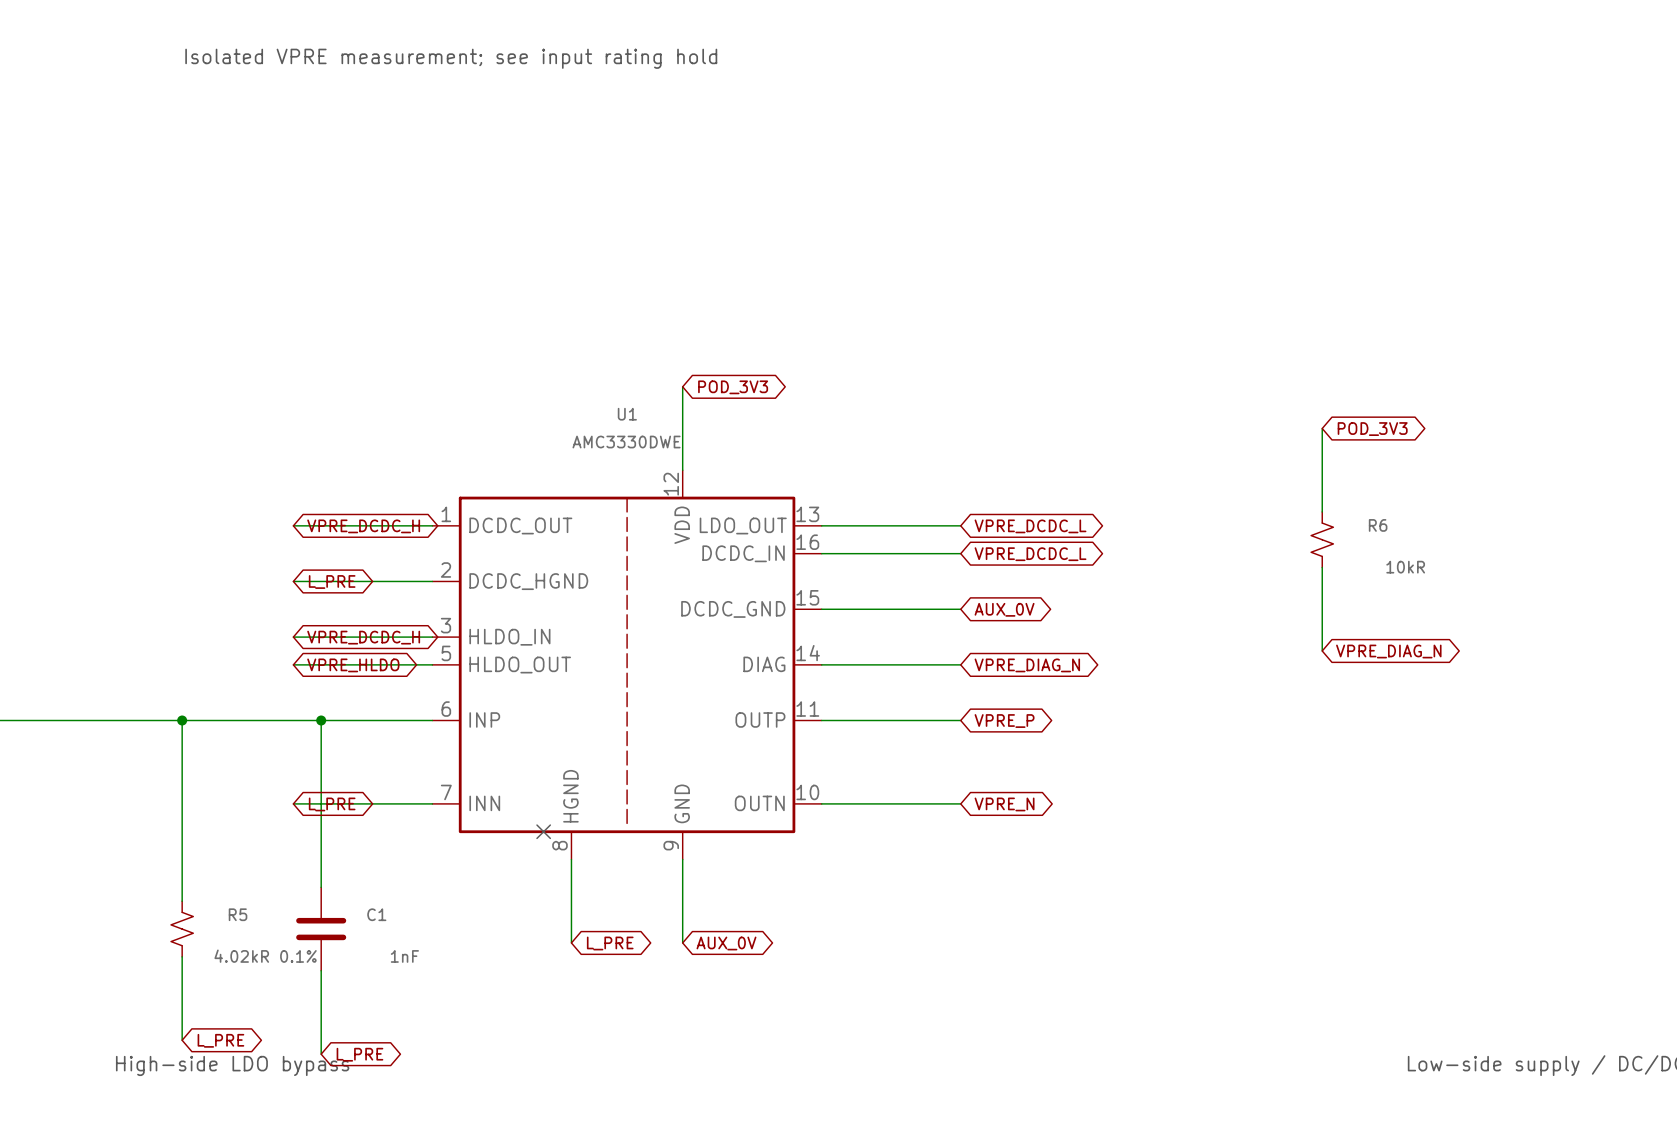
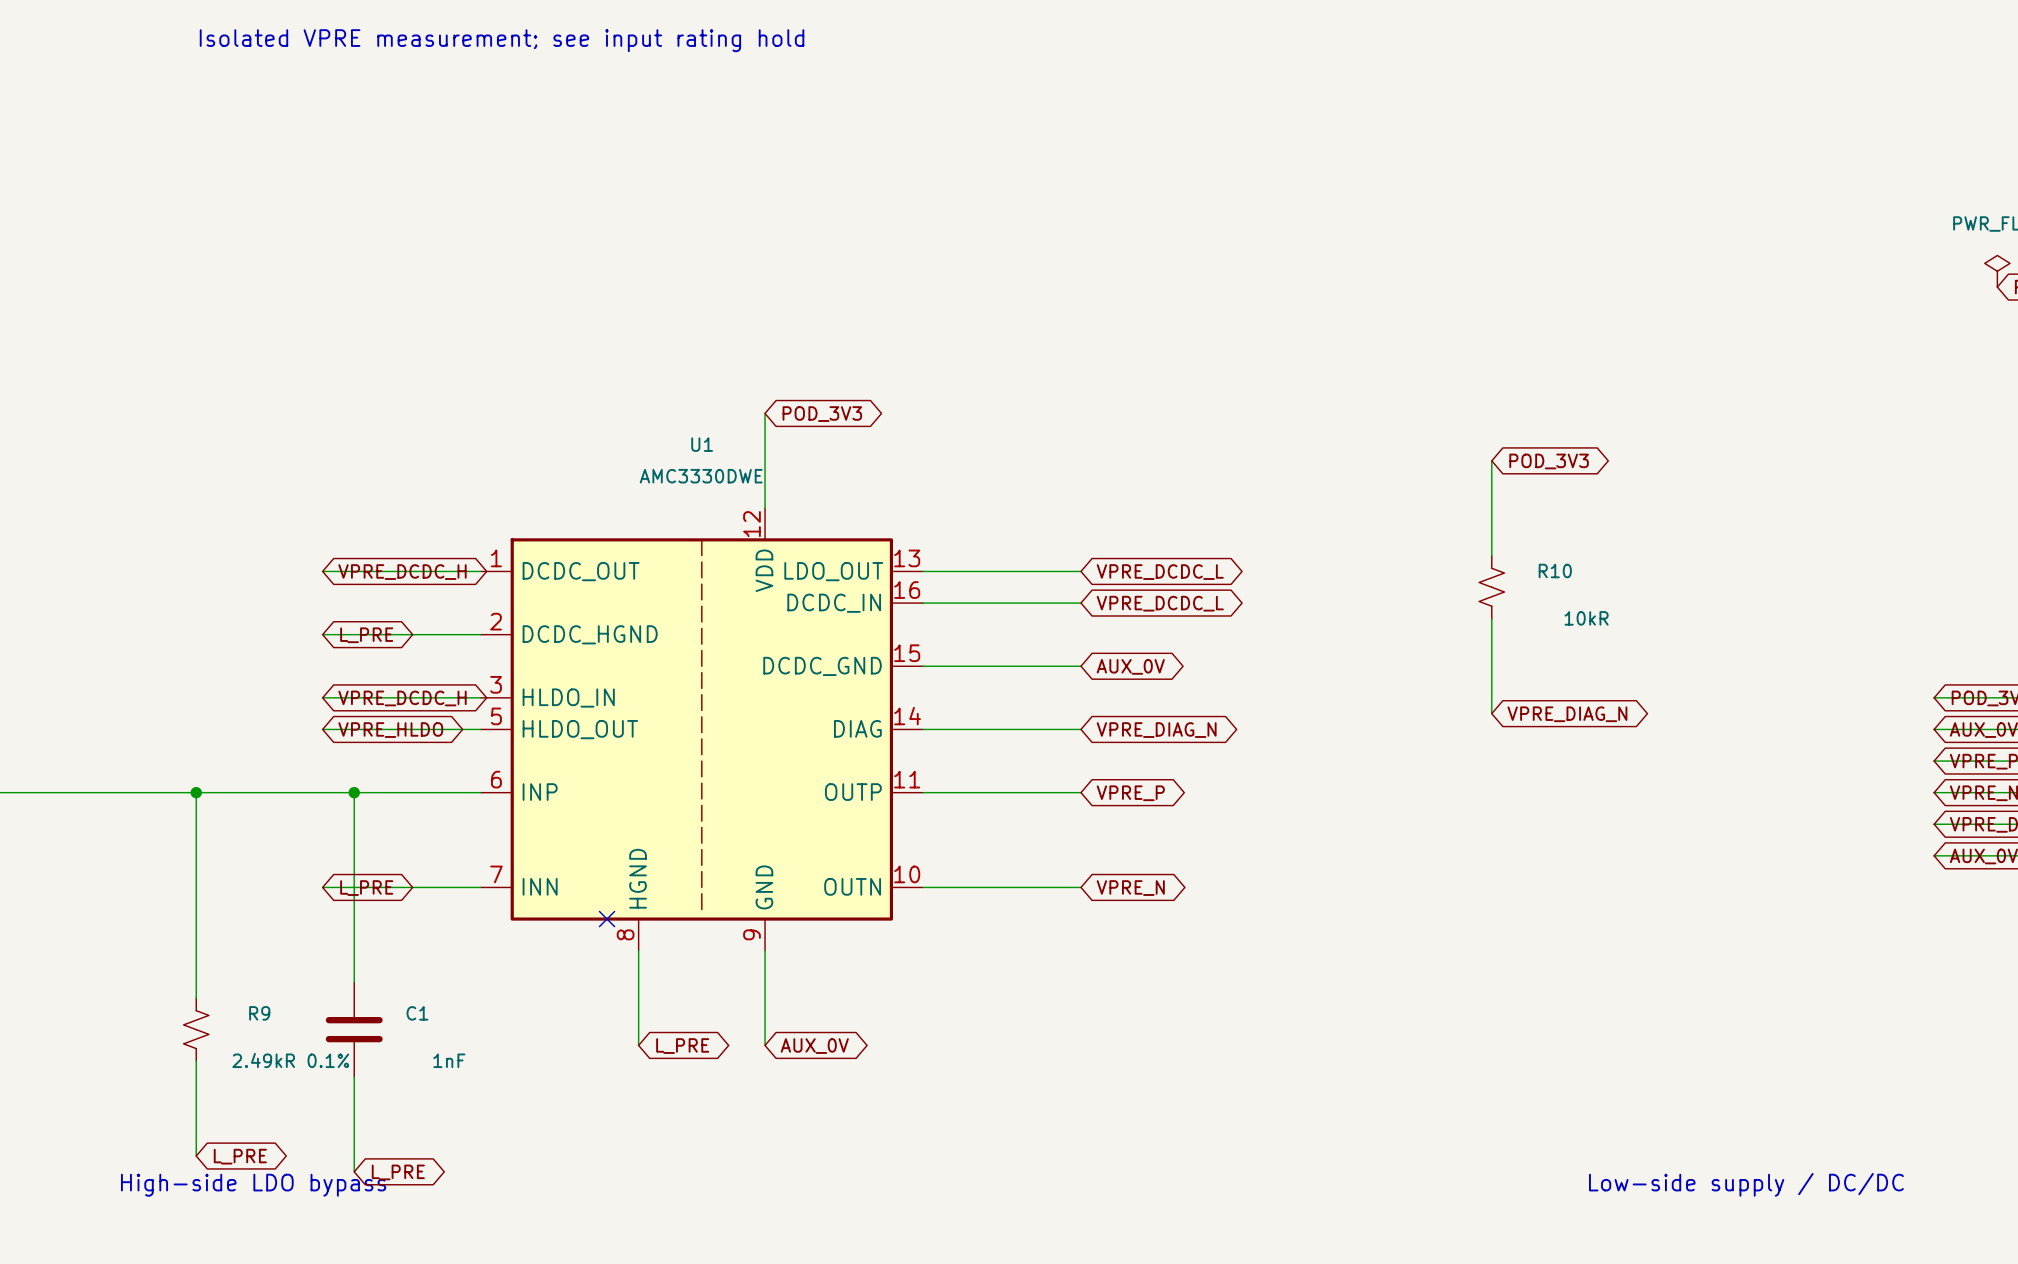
R6 name: R6 (1378, 525) -> R10 (1555, 570)
R5 name: R5 (238, 914) -> R9 (259, 1013)
R5 value: 4.02kR 0.1% (265, 956) -> 2.49kR 0.1% (290, 1060)

